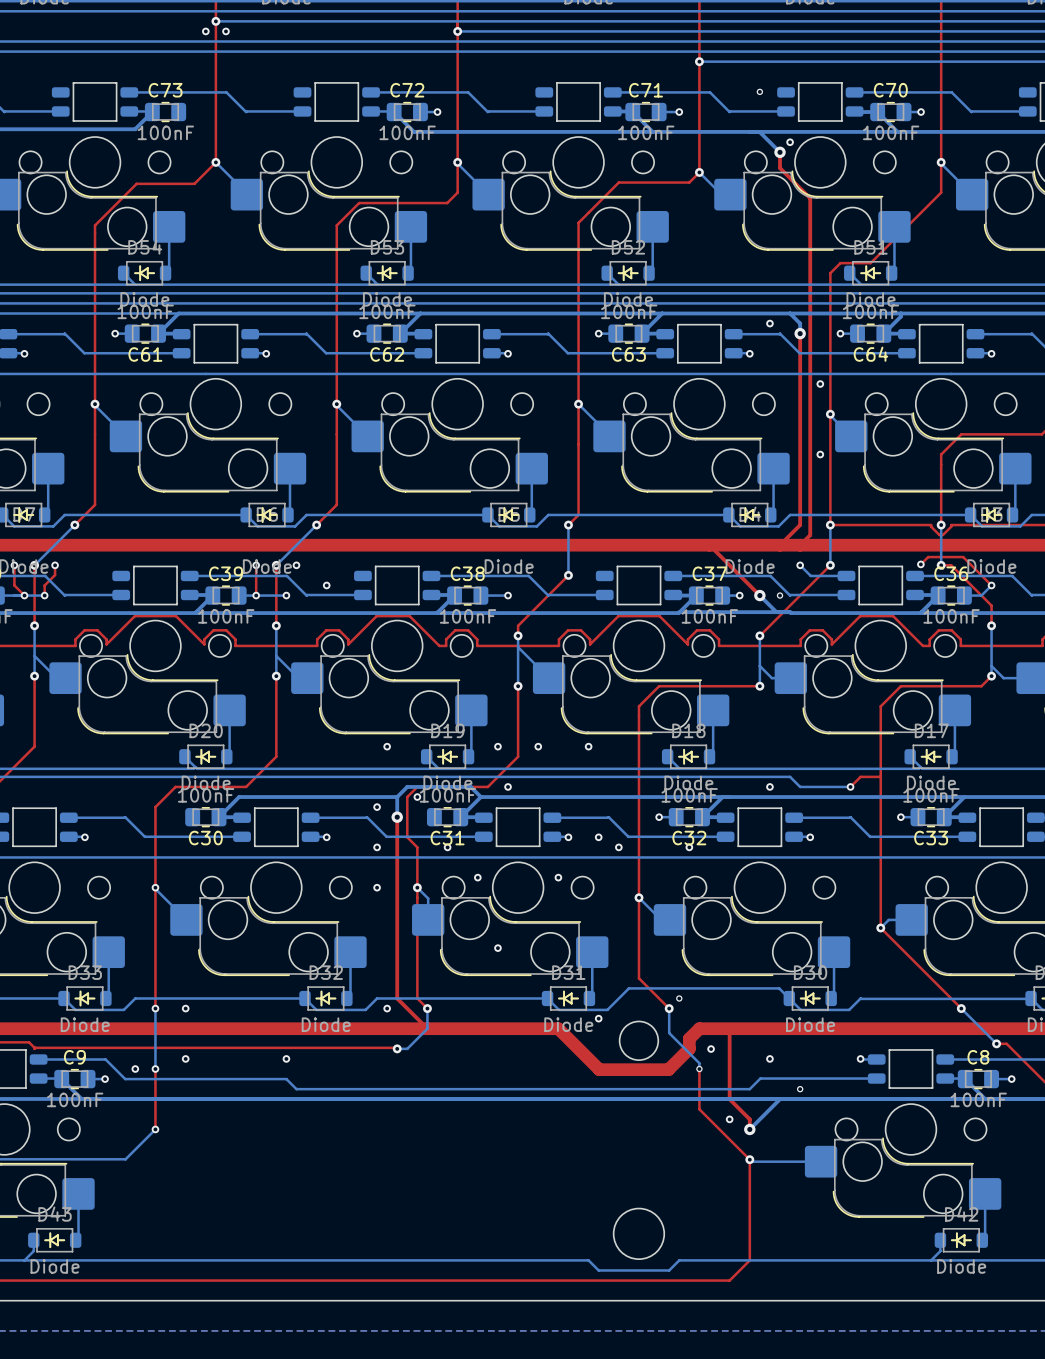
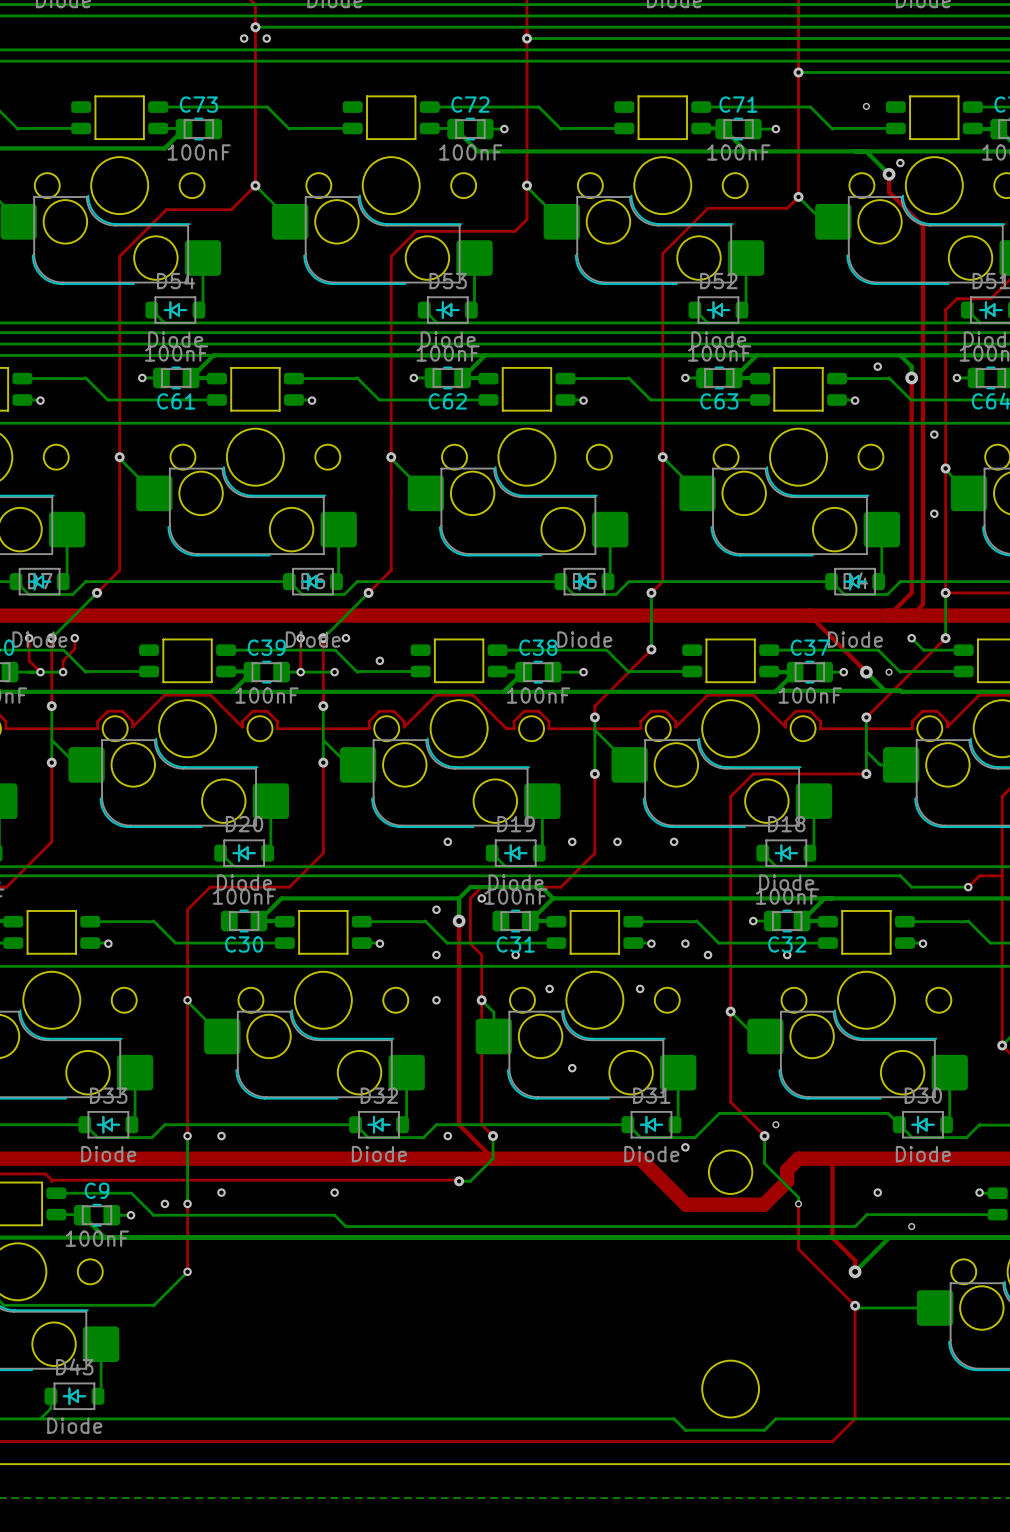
via: (508, 786) -> none
via: (769, 786) -> none
via: (711, 1049) -> none
via: (729, 1119) -> none

